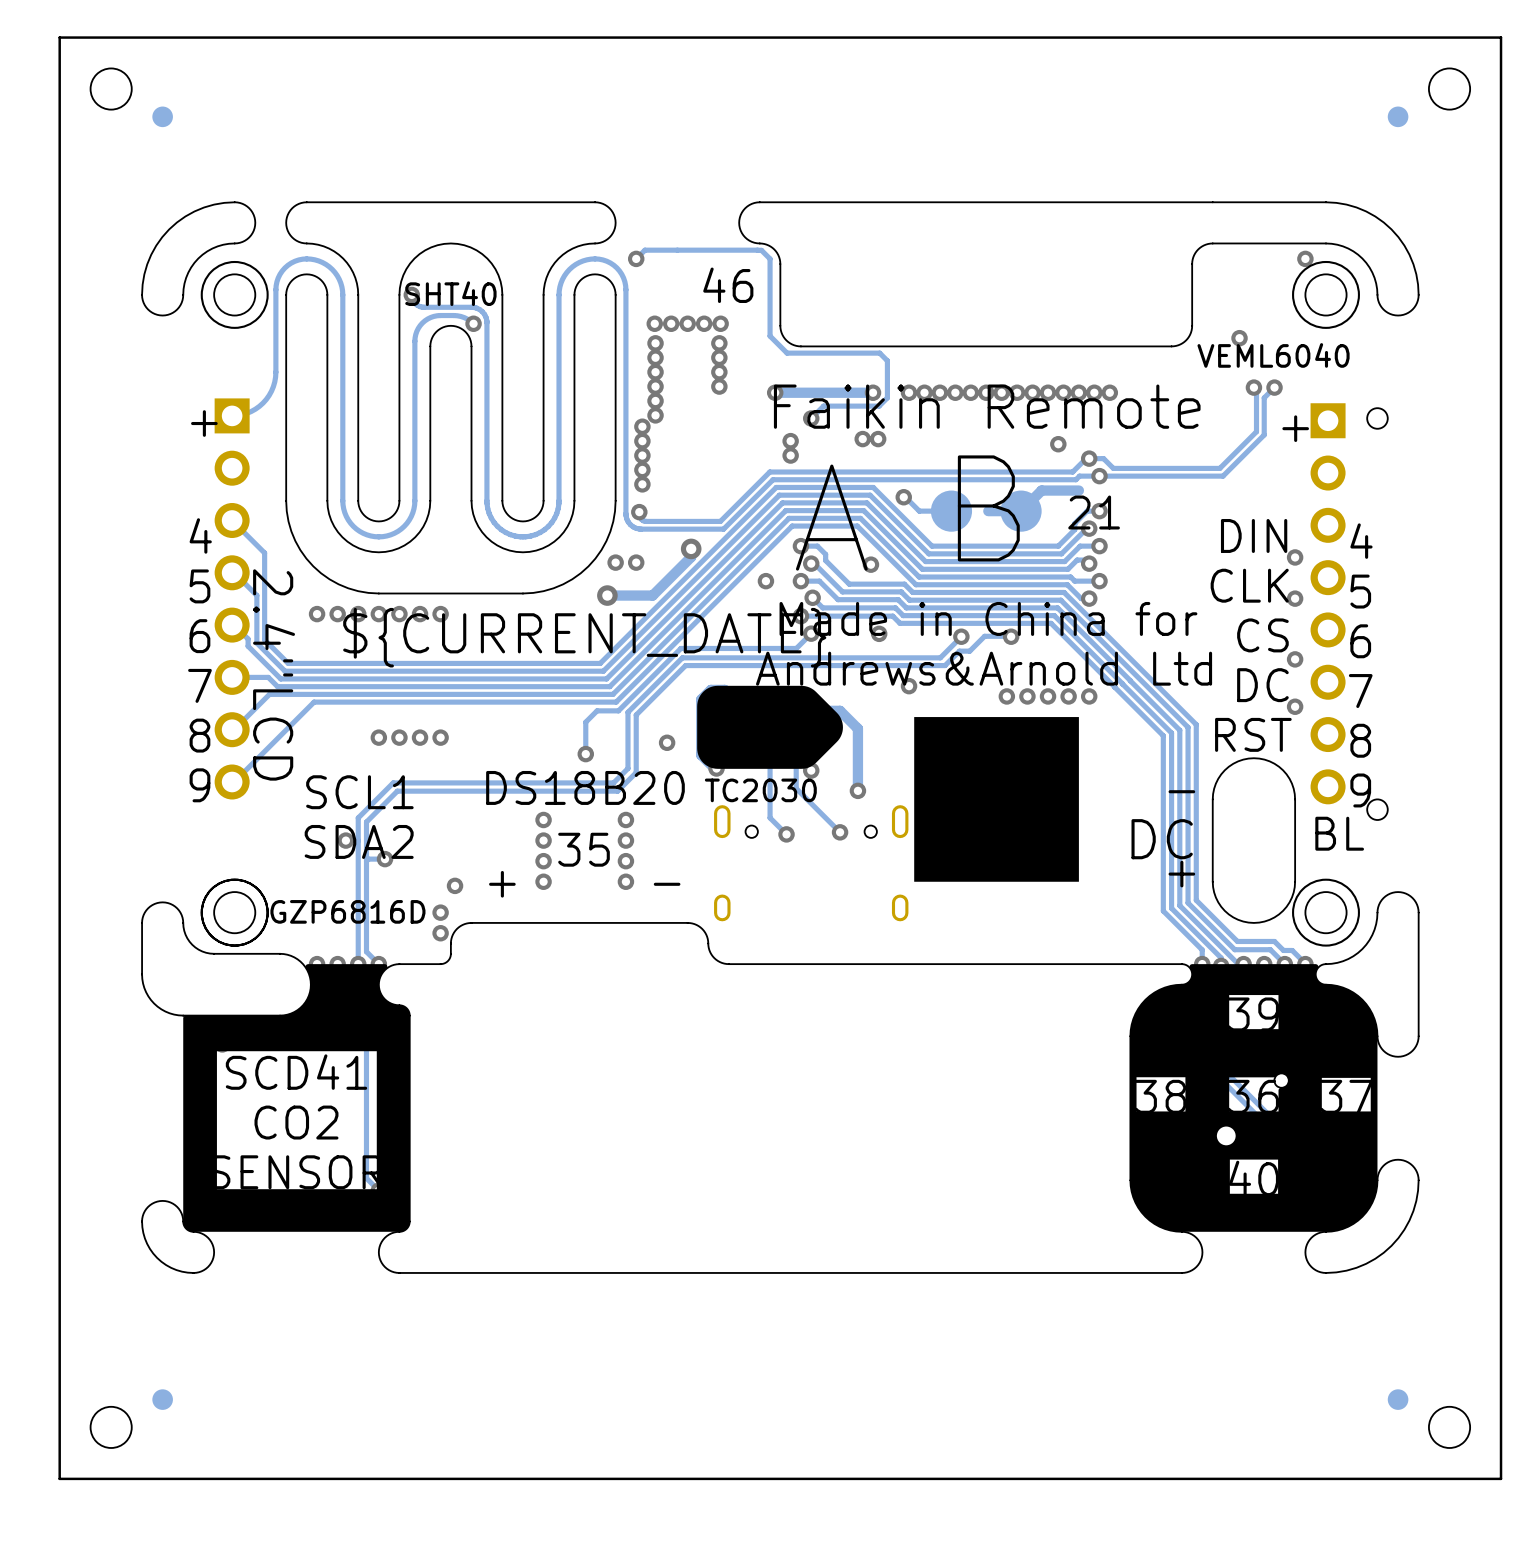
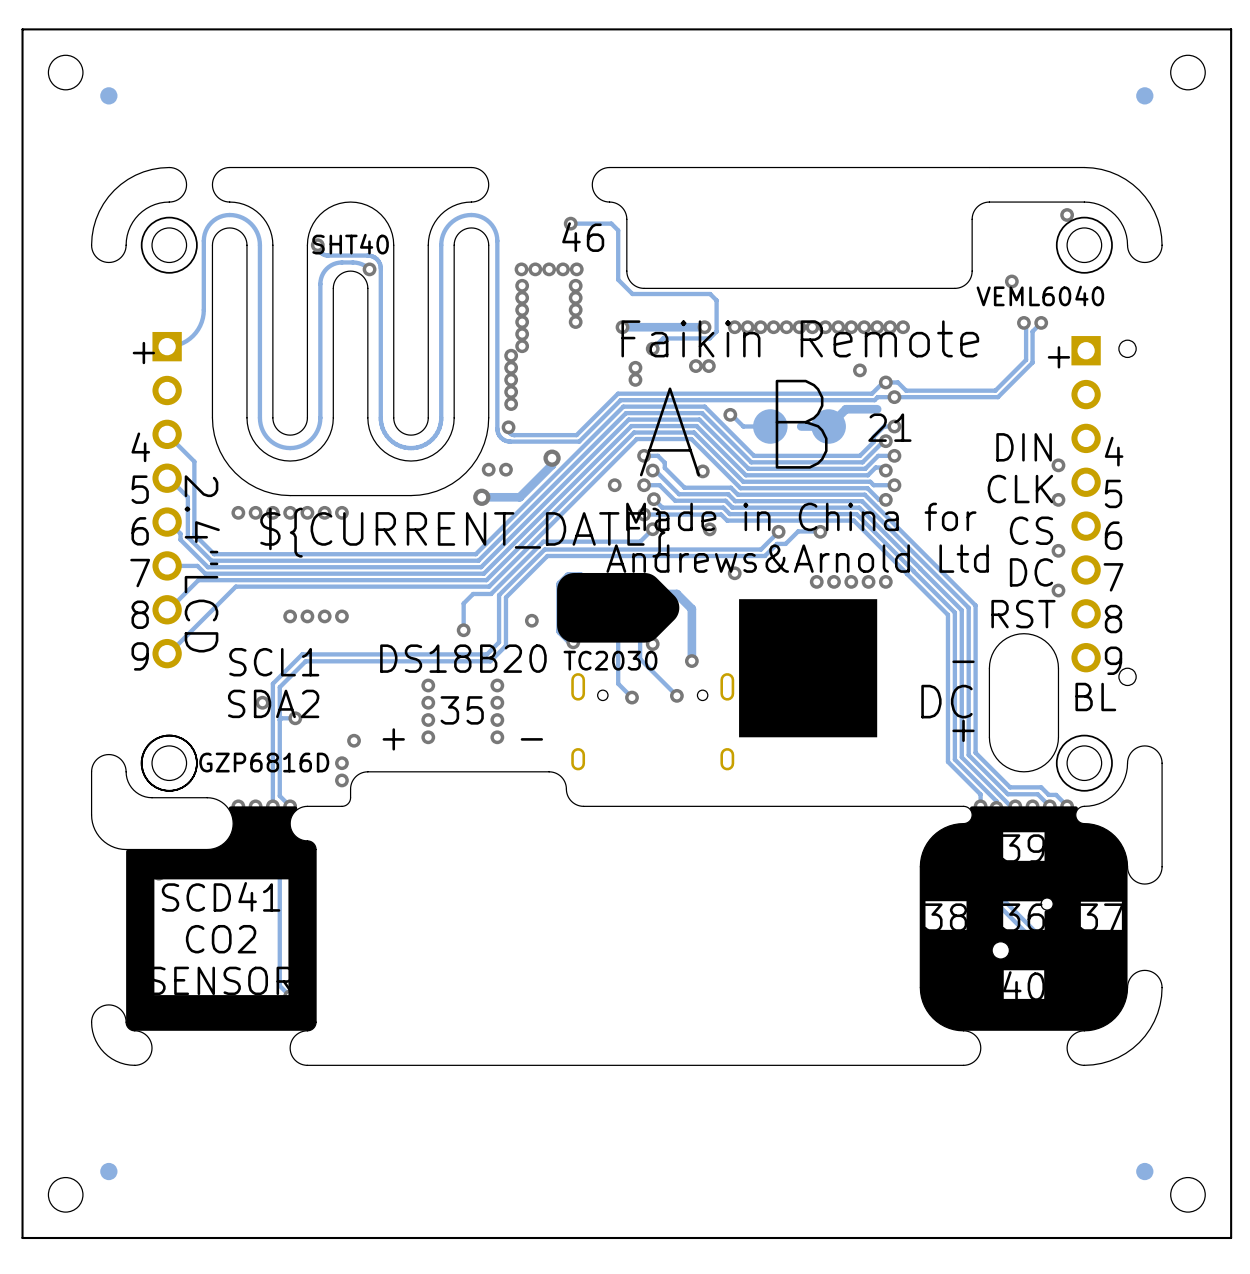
track: (636, 258) (644, 250) (761, 250) (770, 258) (770, 277) -> (570, 223) (611, 223) (618, 230)
via position: (636, 258) -> (570, 223)

